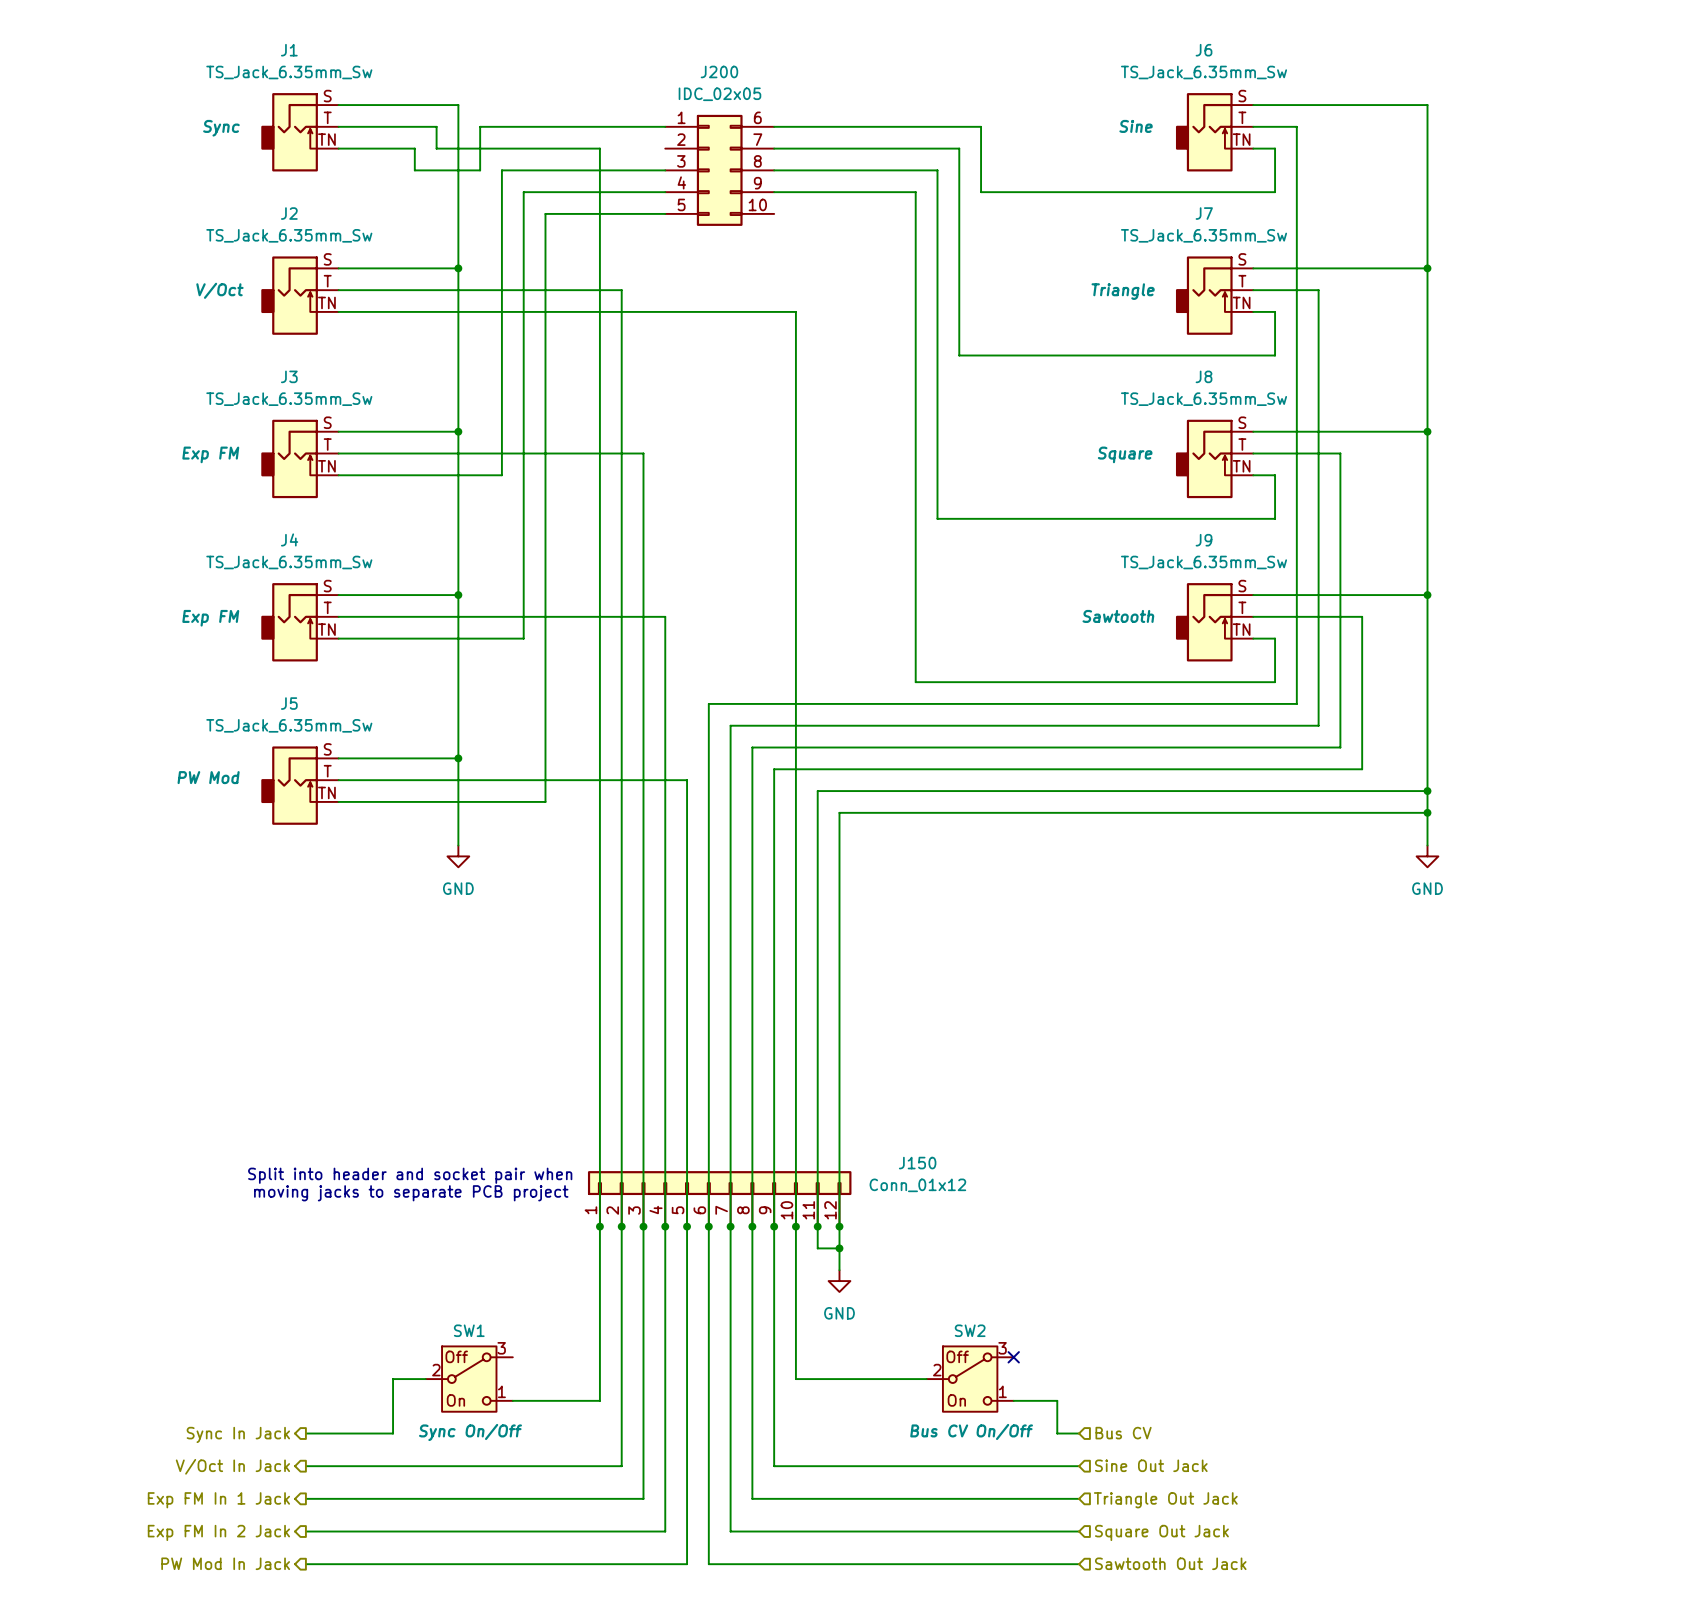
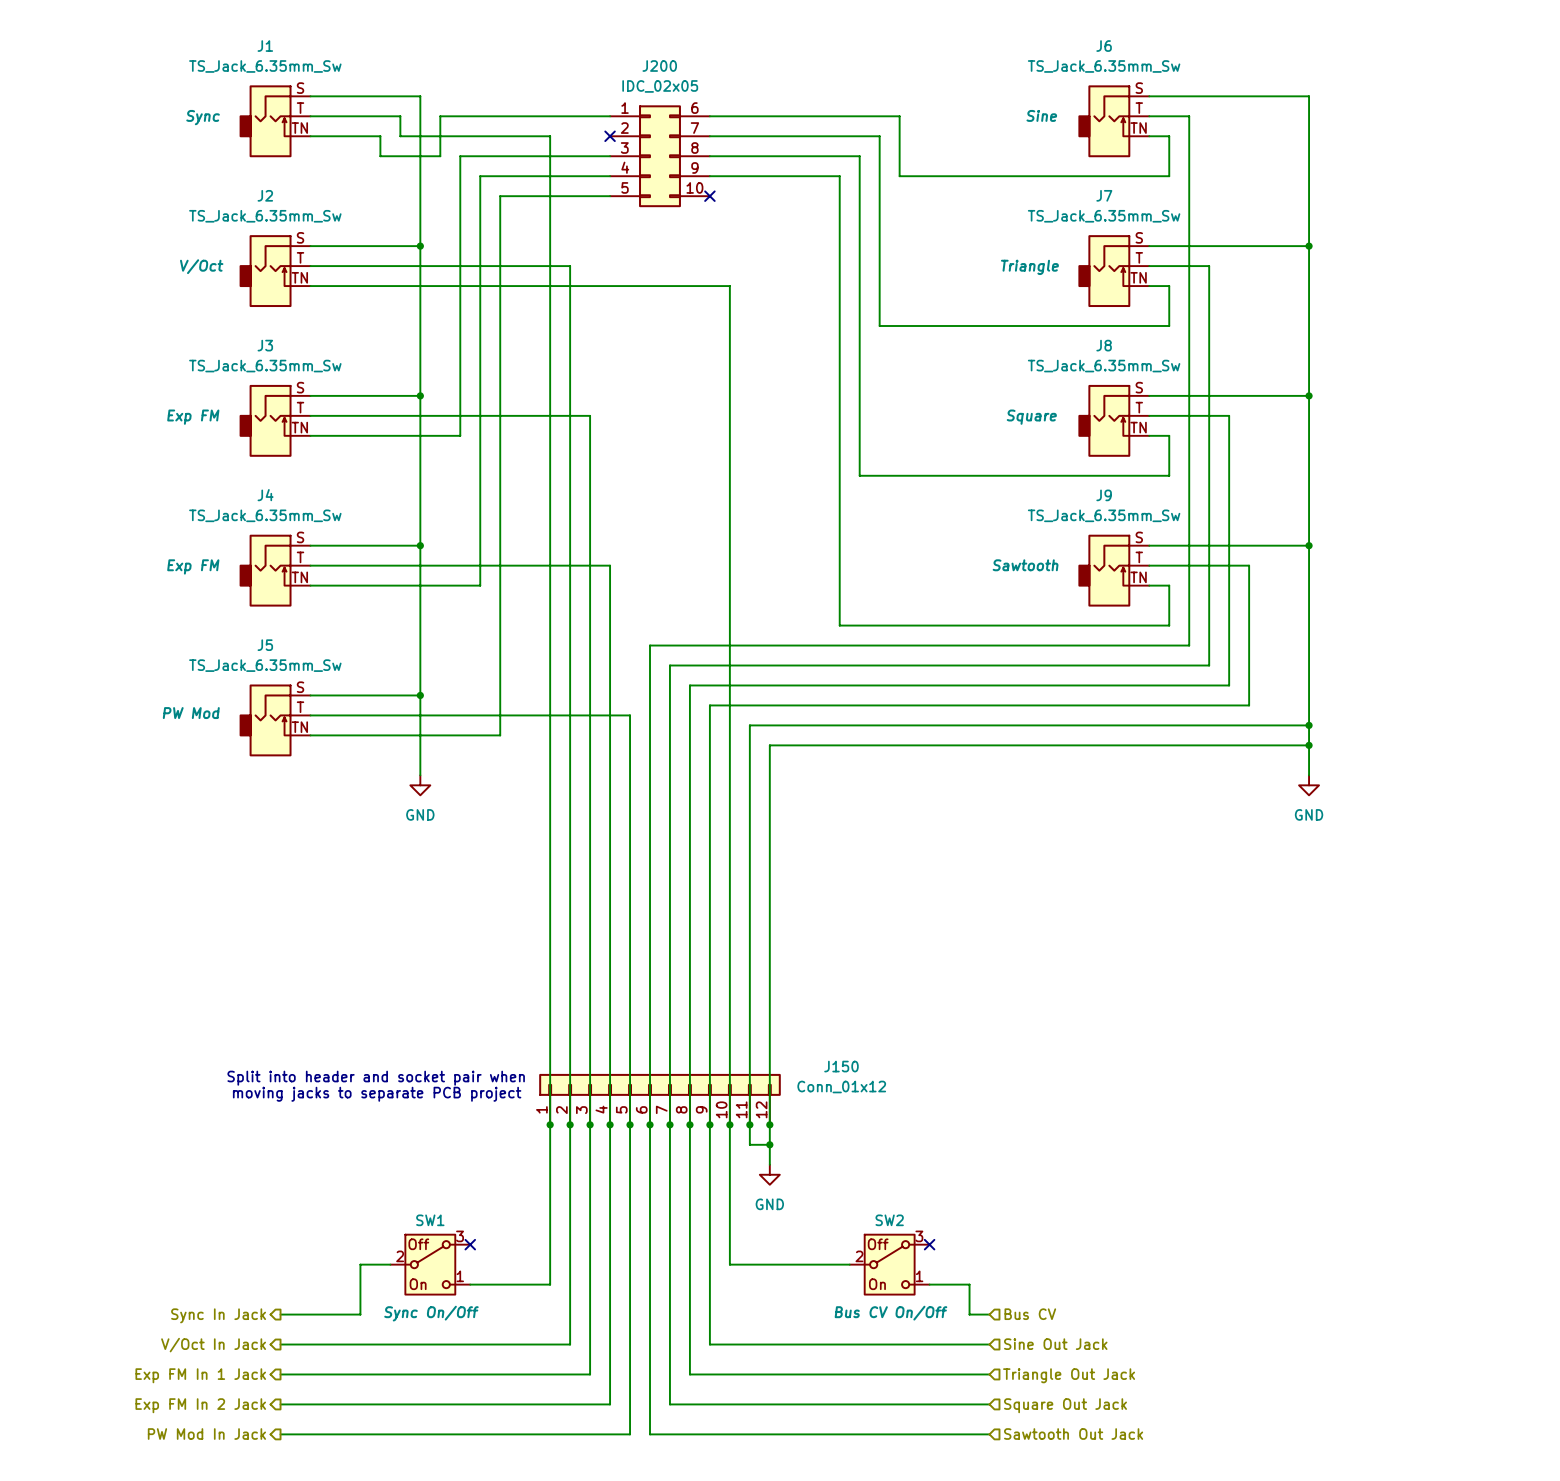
no-connect mark: none -> (610, 136)
no-connect mark: none -> (709, 196)
no-connect mark: none -> (470, 1244)

